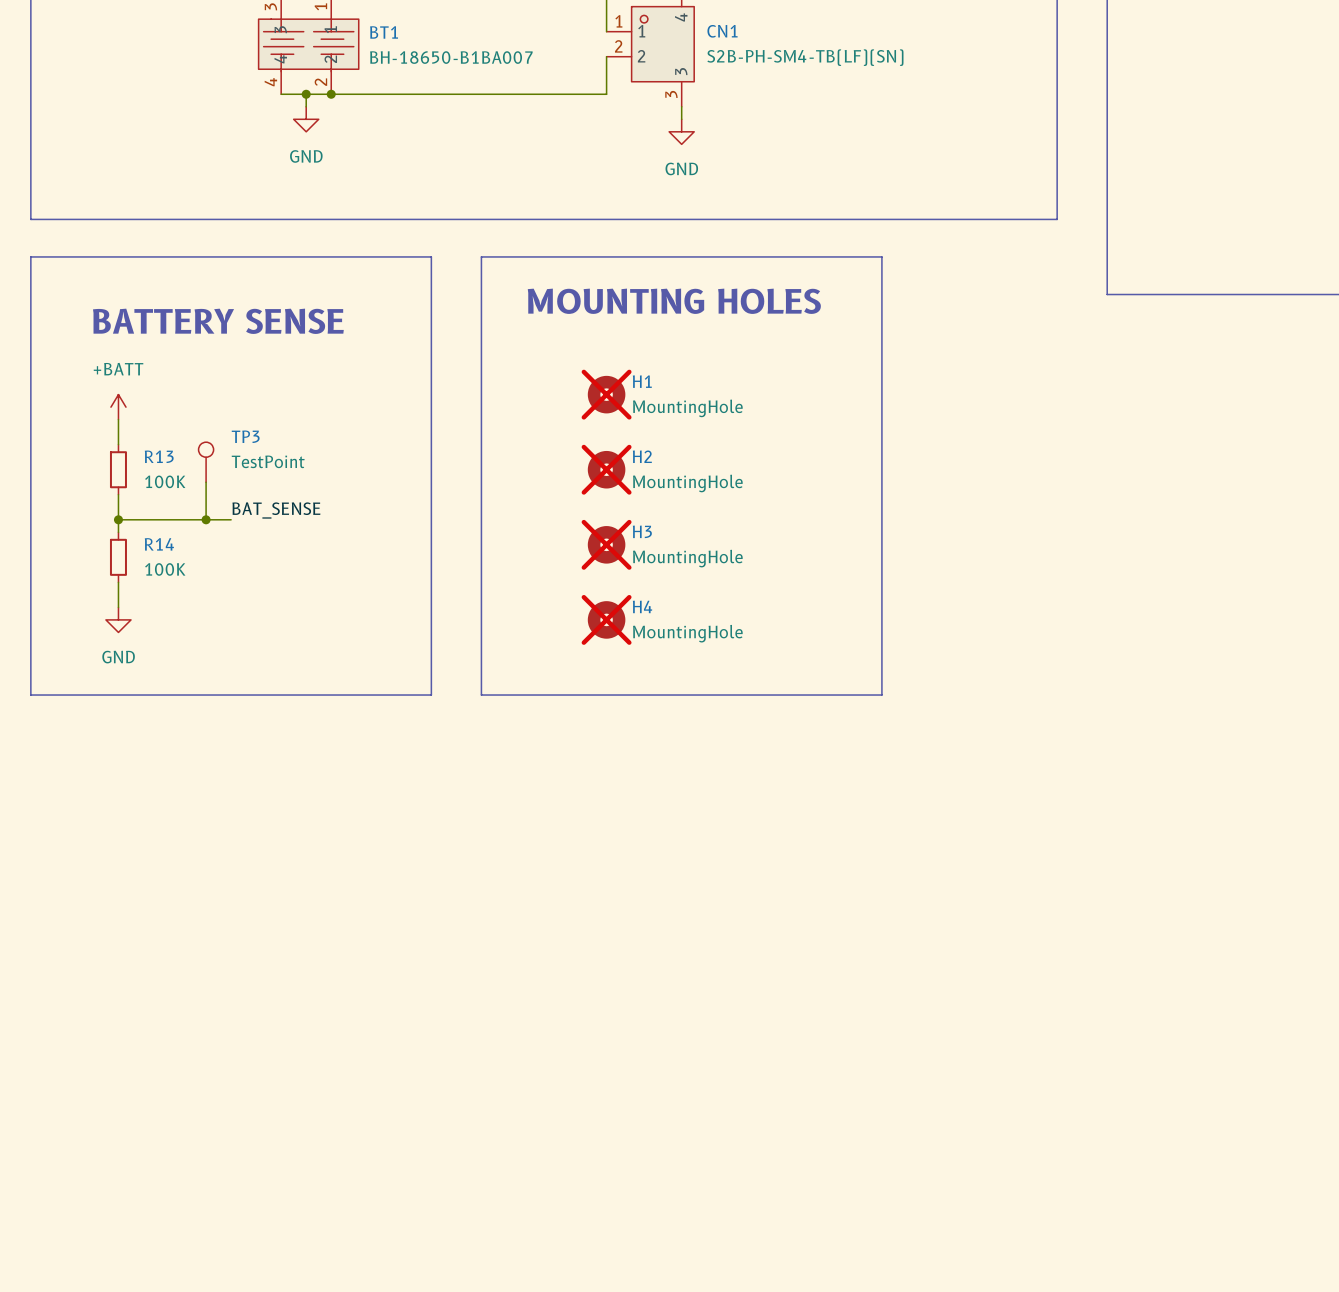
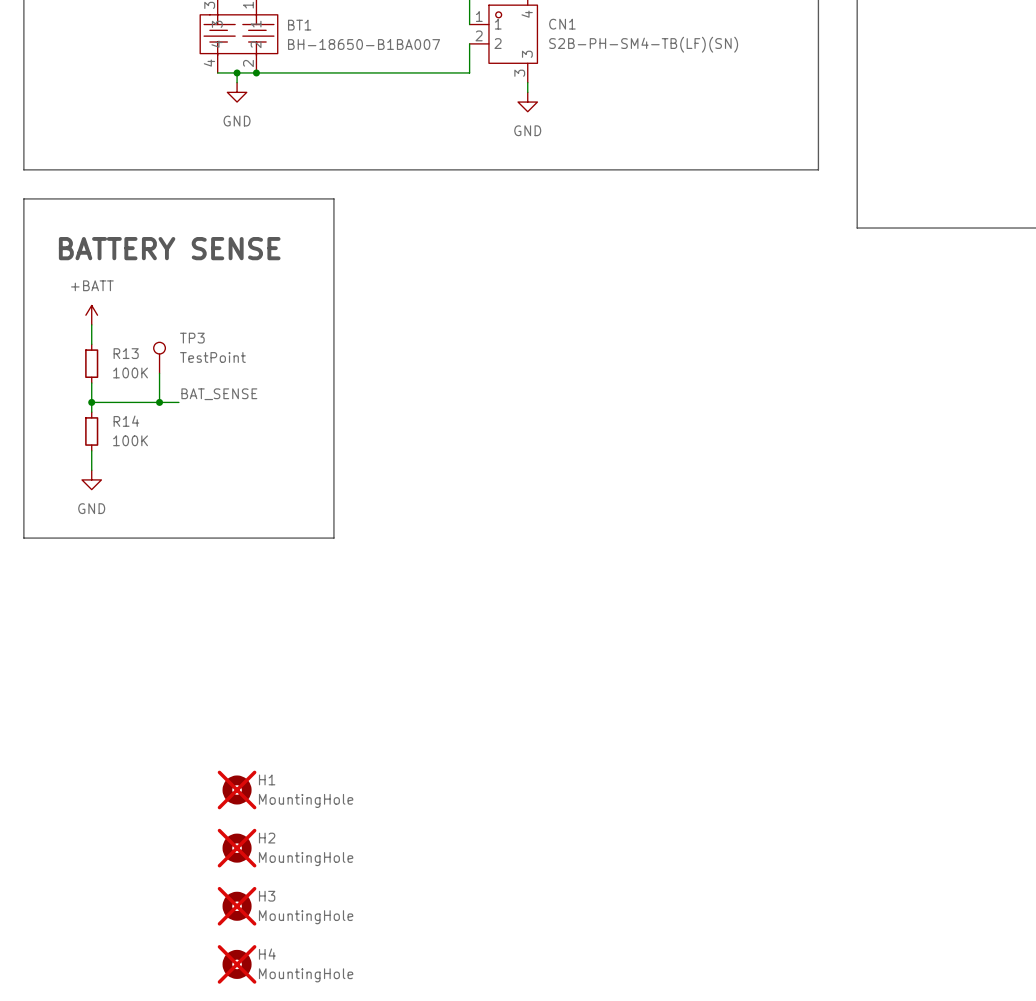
line: (481, 256) (881, 256) (881, 695) (481, 695) (481, 256) -> none
text: MOUNTING HOLES (674, 301) -> none
H1 position: (606, 394) -> (237, 789)
H2 position: (606, 469) -> (237, 848)
H3 position: (606, 544) -> (237, 906)
H4 position: (606, 619) -> (237, 964)

